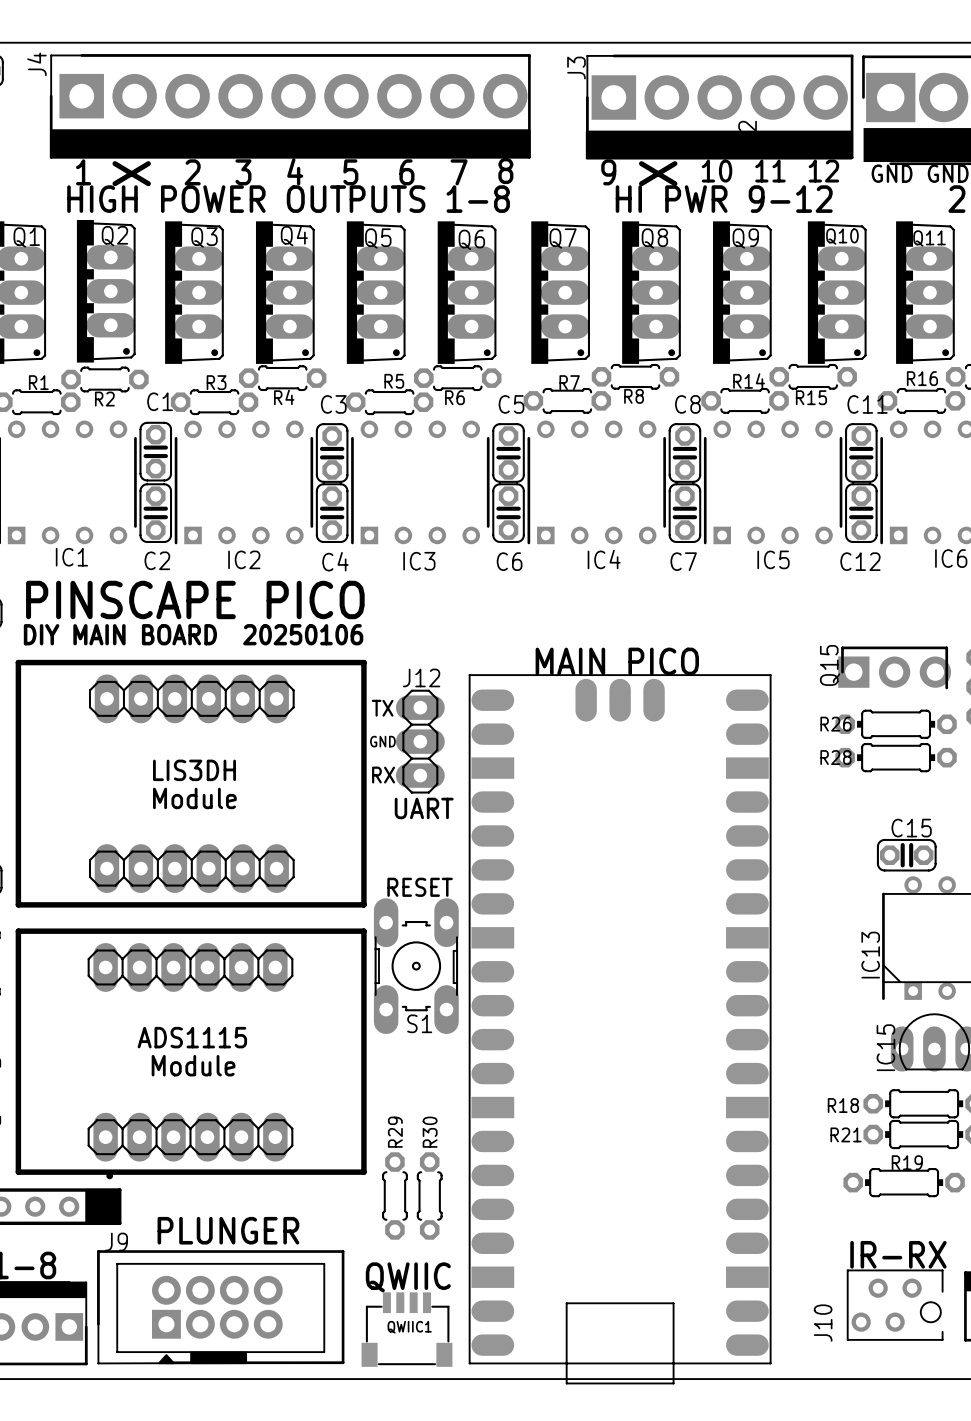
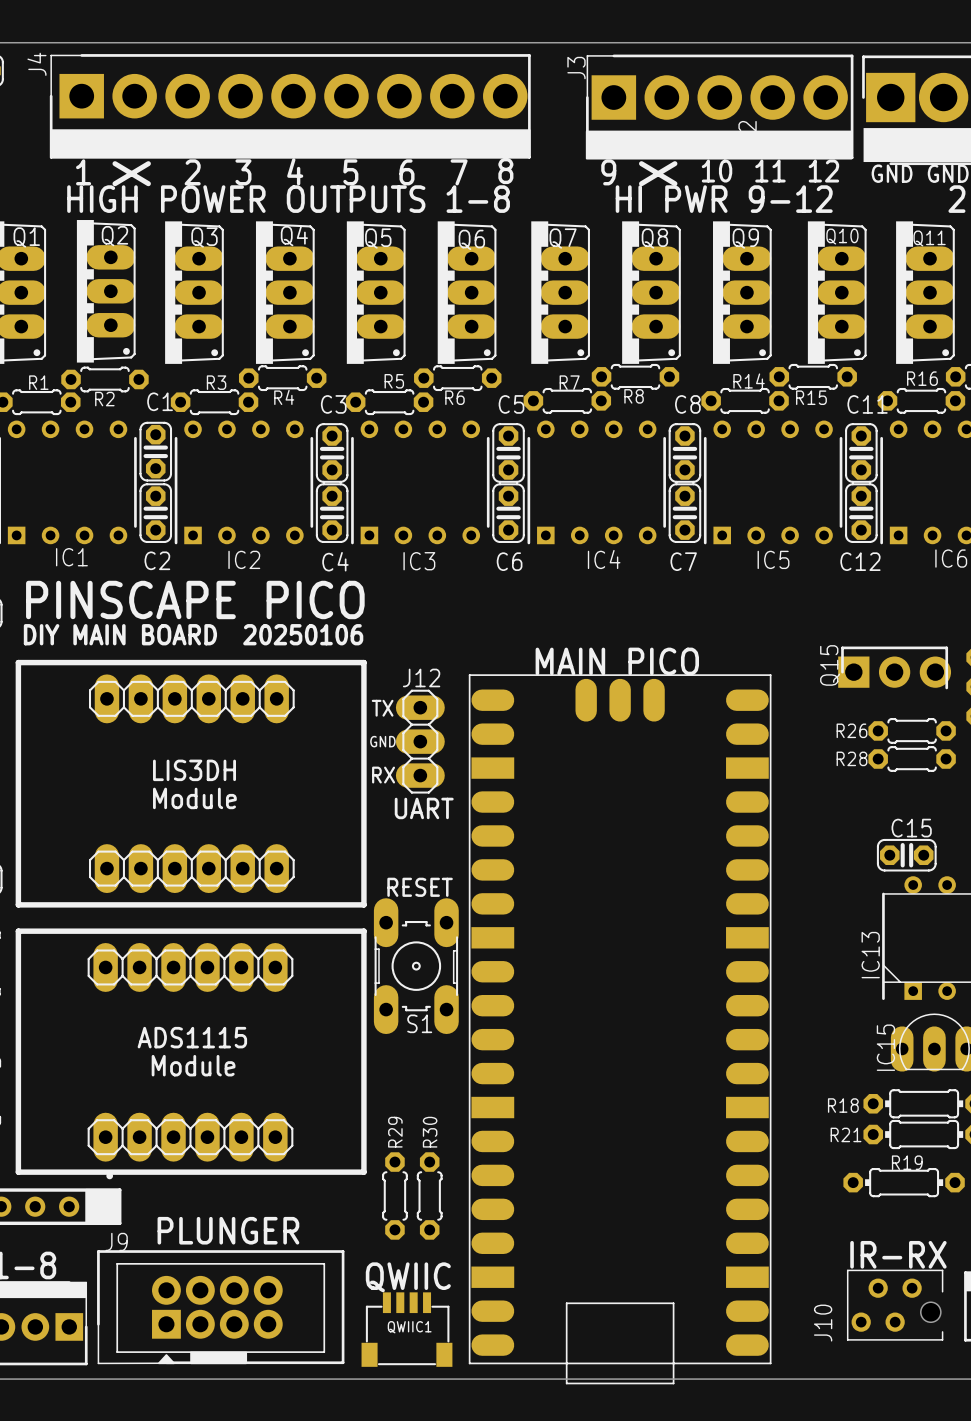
R26 footprint: [835, 709, 957, 739] -> [868, 718, 956, 744]
R28 footprint: [835, 743, 957, 773] -> [868, 746, 956, 772]

